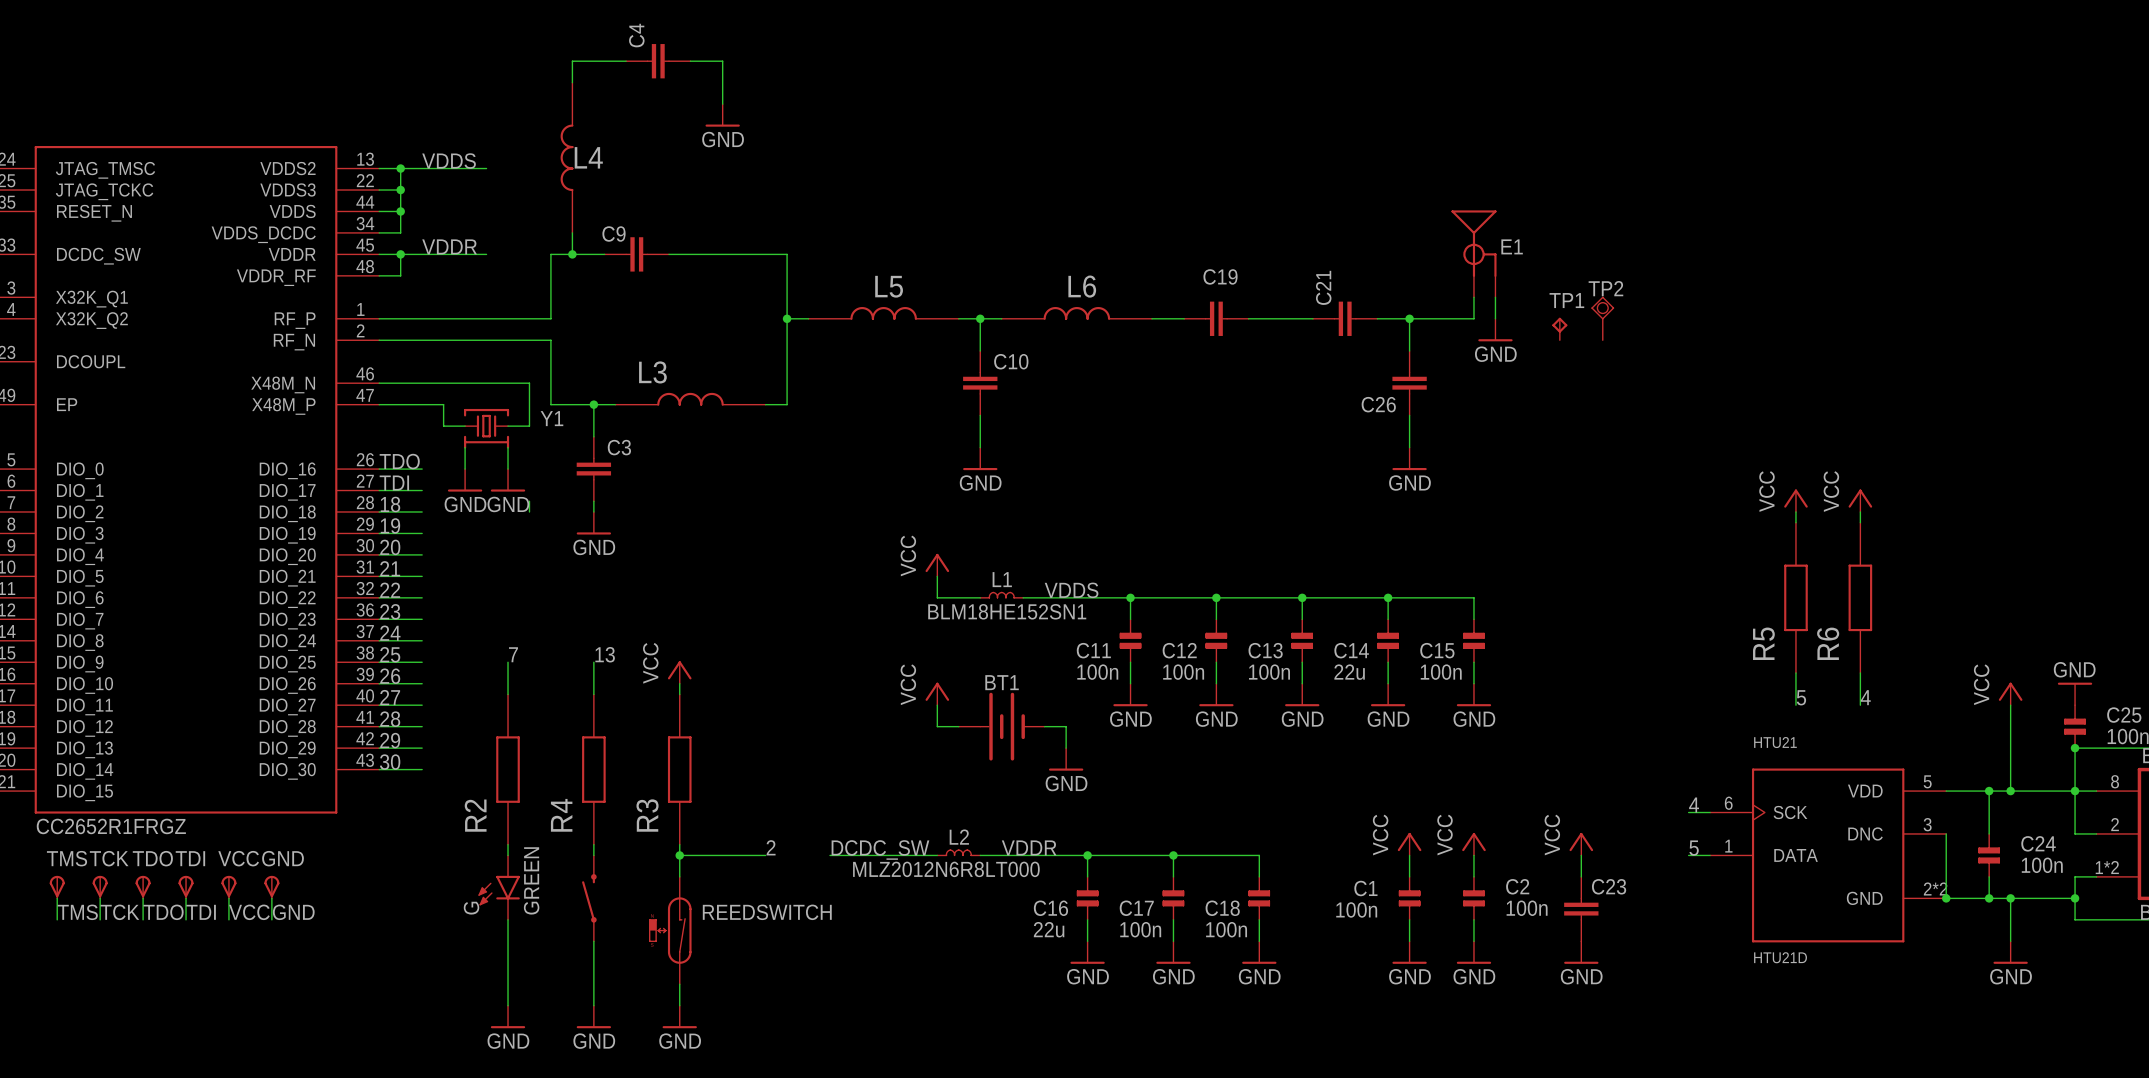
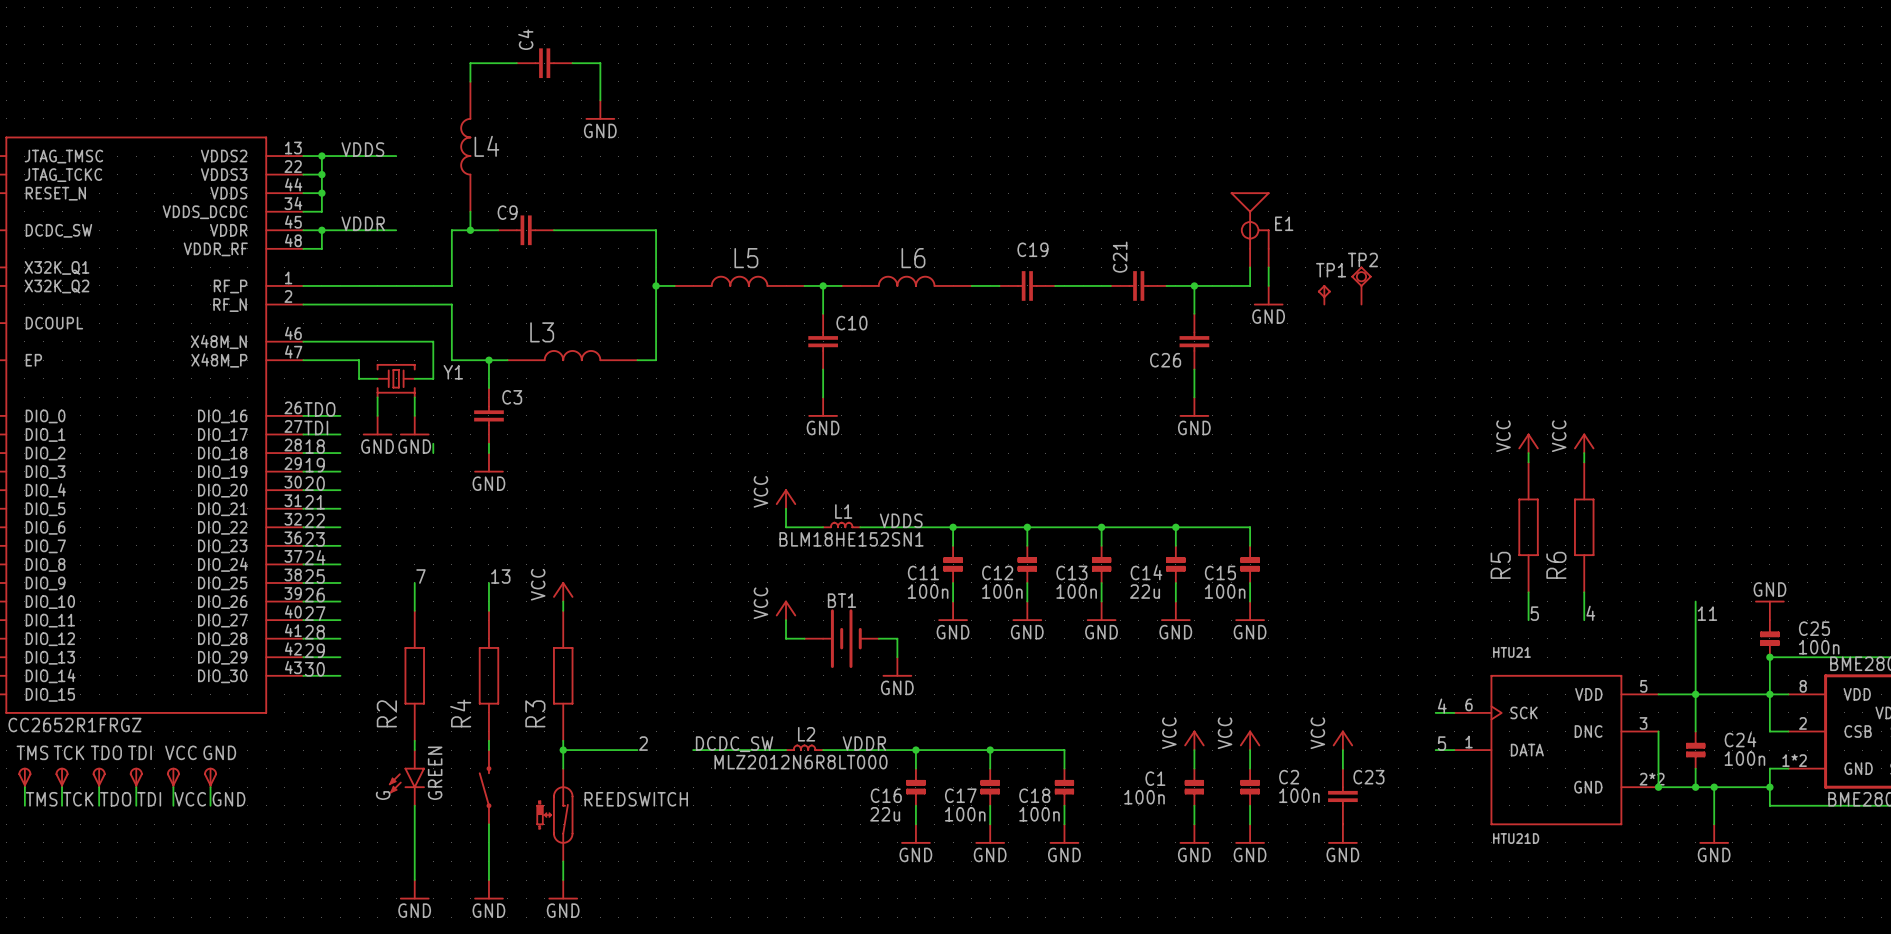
wire: none -> (1695, 601) (1695, 694)
power symbol: VCC (2010, 693) -> none
label: none -> 11 (1707, 613)
wire: (2010, 705) (2010, 791) -> none
junction: (2010, 791) -> none

